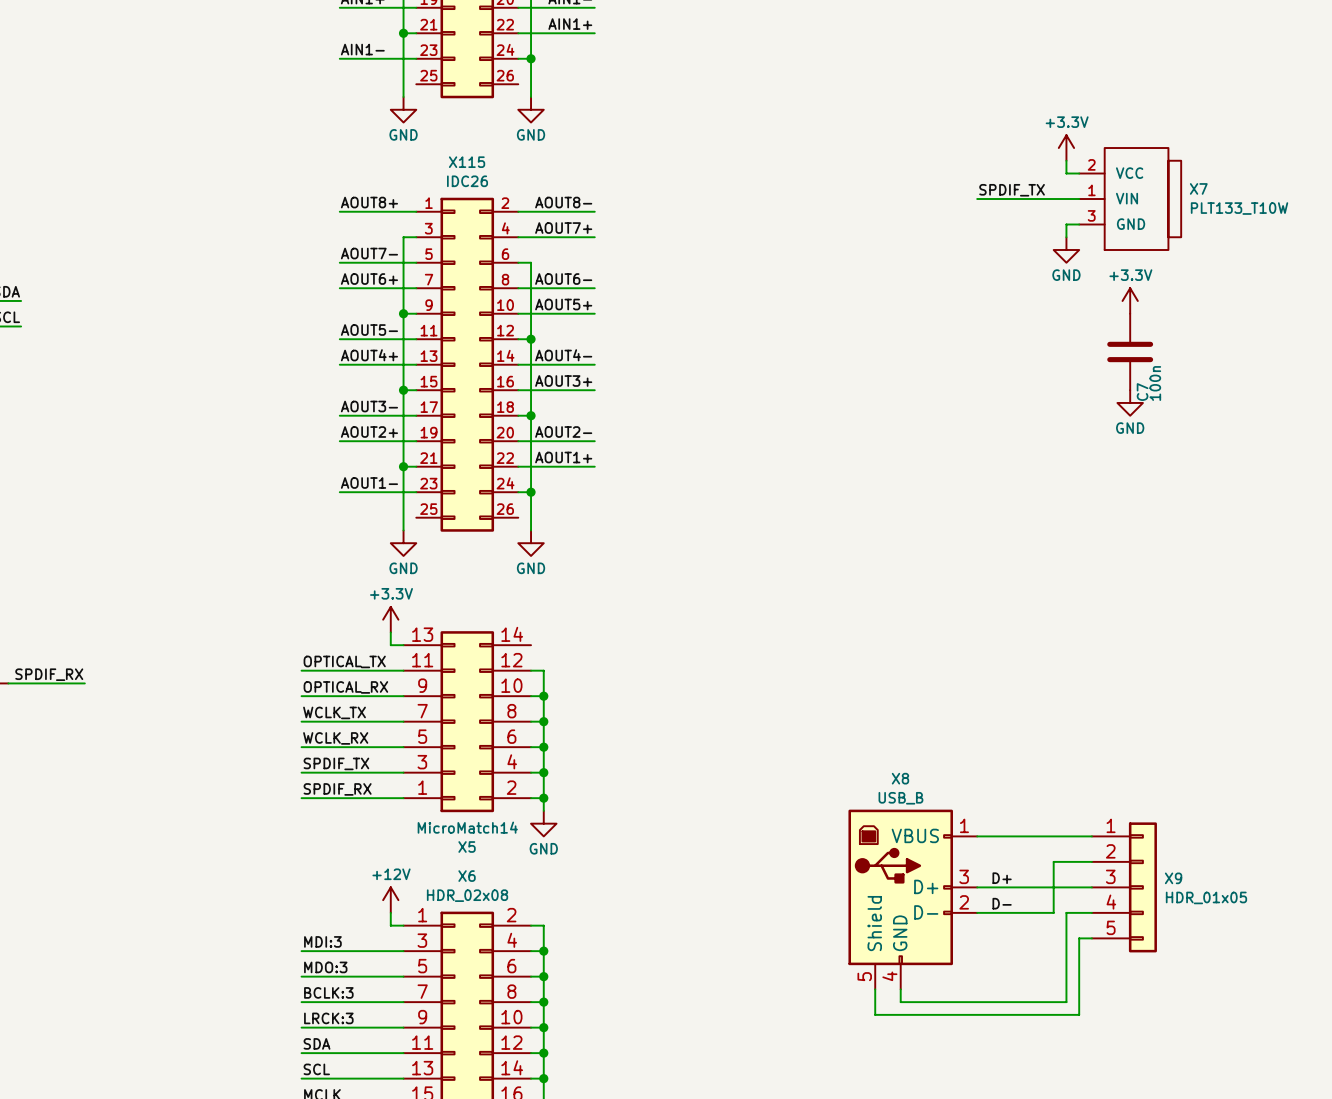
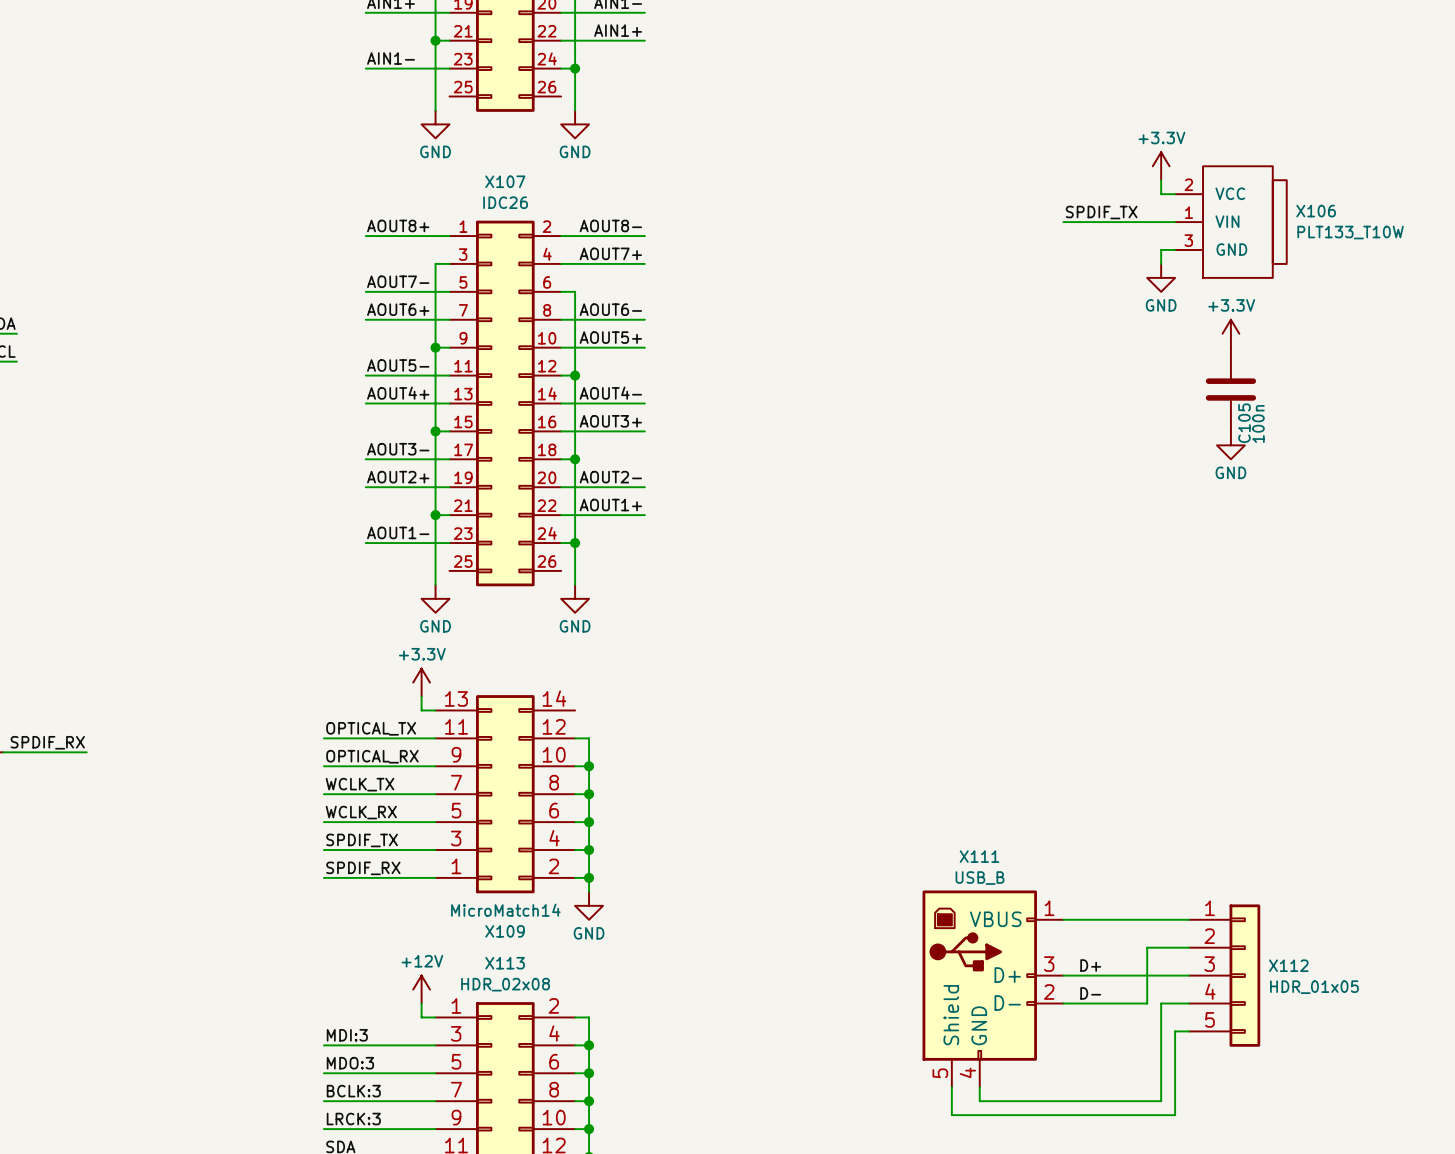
X115 name: X115 (467, 162) -> X107 (505, 181)
X7 name: X7 (1198, 188) -> X106 (1316, 211)
C7 name: C7 (1142, 392) -> C105 (1244, 423)
X8 name: X8 (900, 778) -> X111 (979, 856)
X5 name: X5 (467, 847) -> X109 (505, 931)
X6 name: X6 (467, 876) -> X113 (505, 963)
X9 name: X9 (1173, 878) -> X112 (1288, 965)

